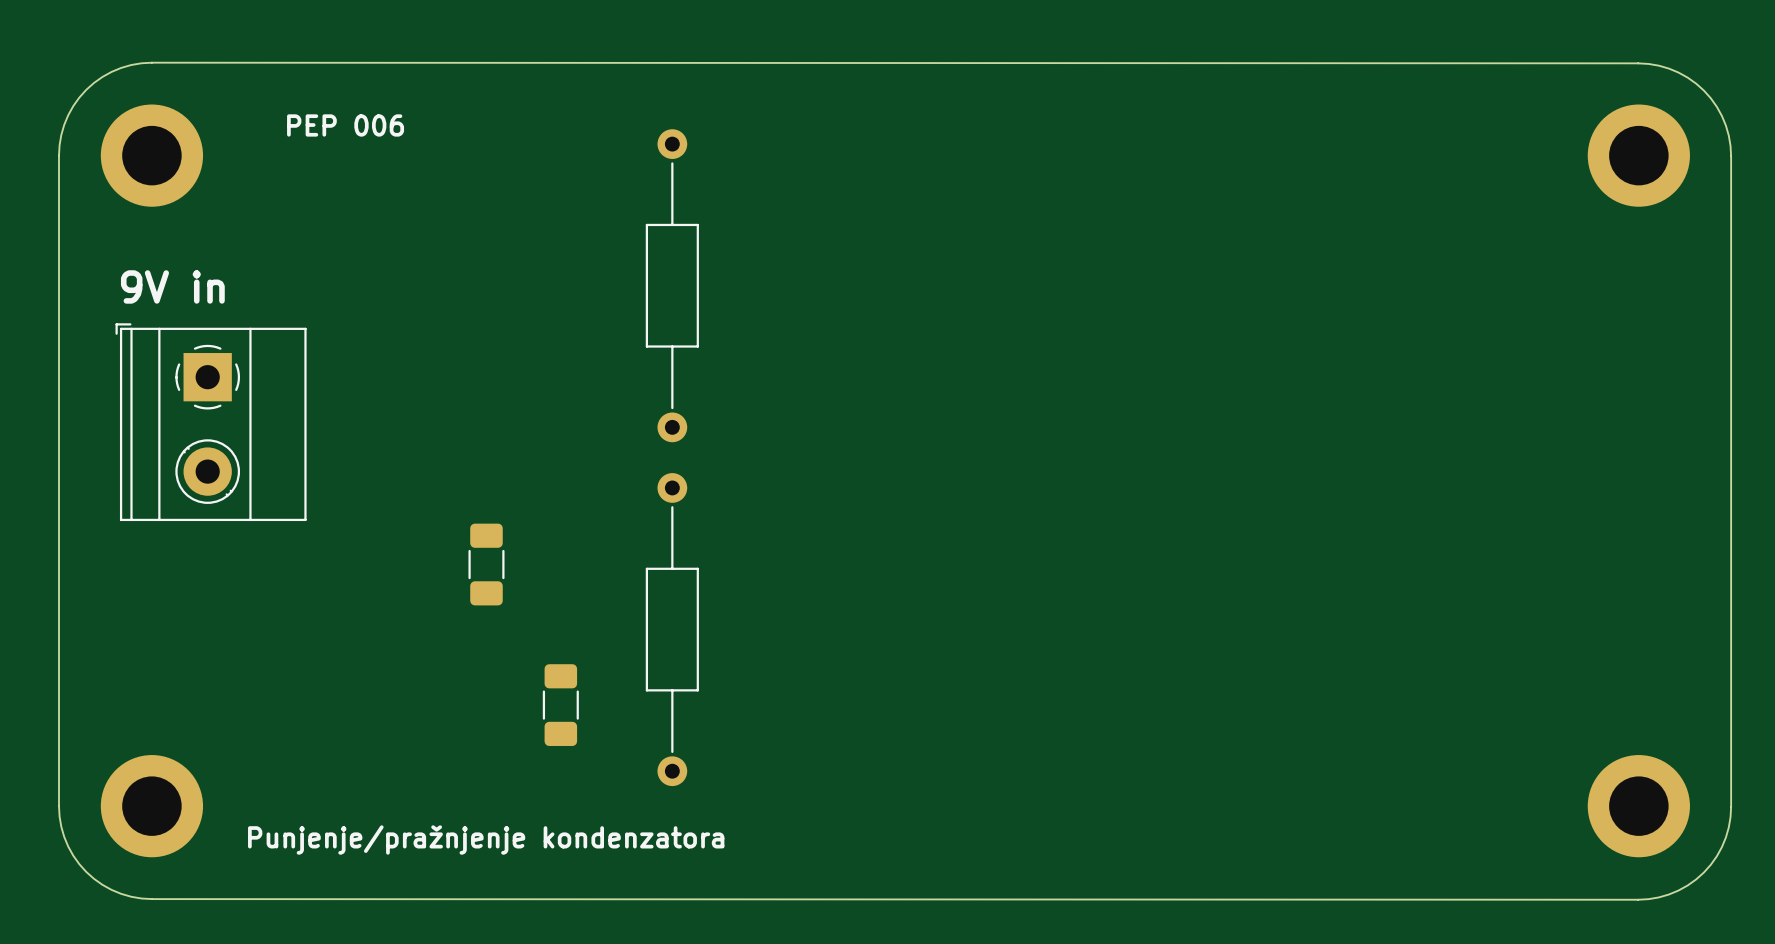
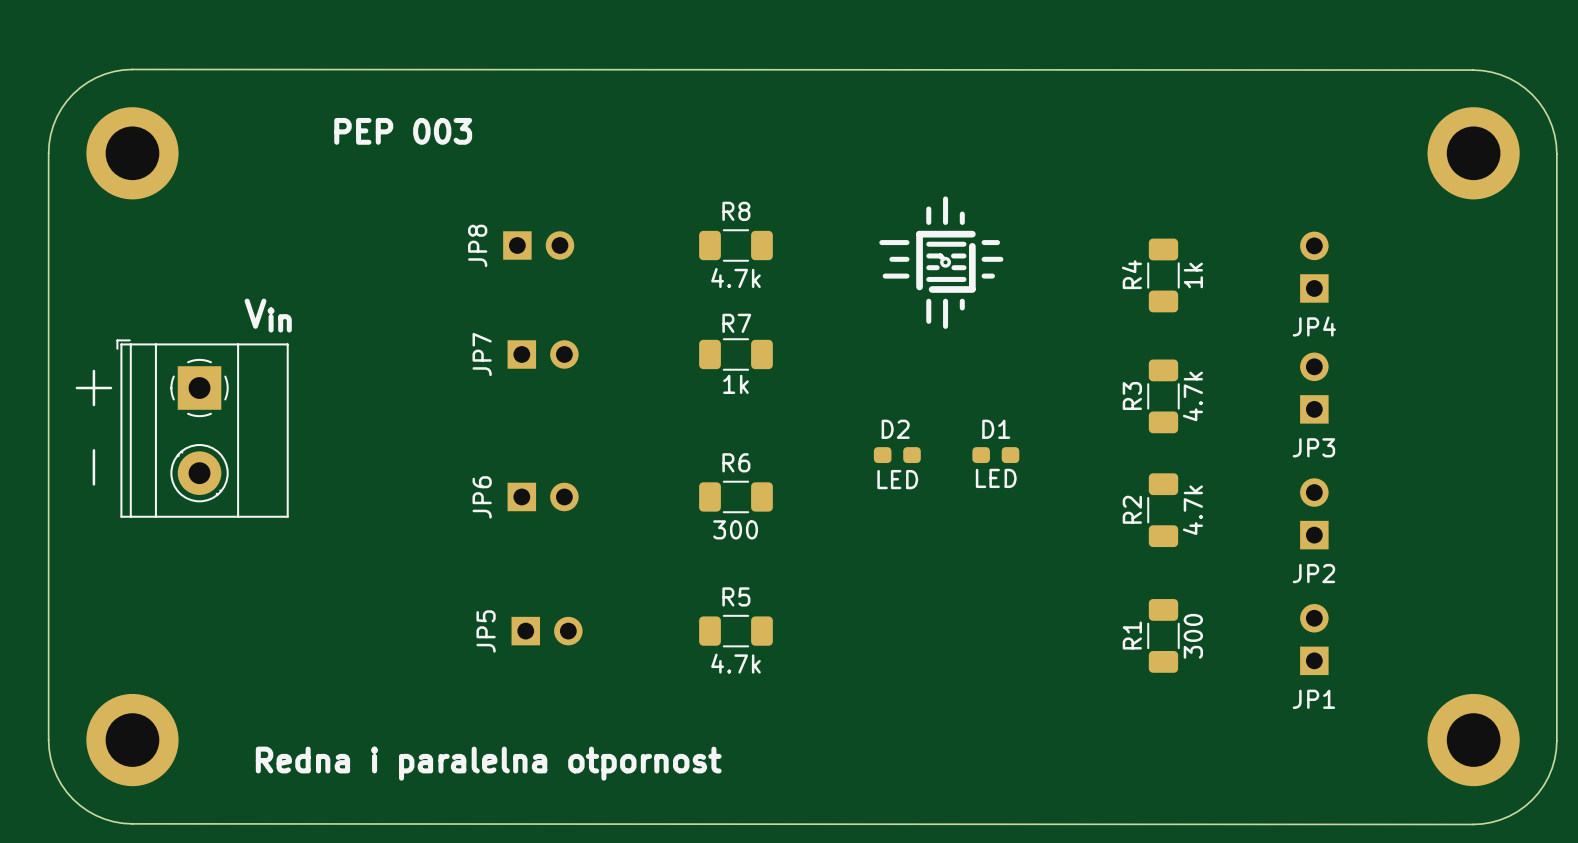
text: PEP 006 (345, 125) -> PEP 003 (403, 131)
drawing: none -> [879, 196, 1004, 329]
JP8: none -> (538, 245)
R8: none -> 4.7k (735, 245)
JP4: none -> (1314, 267)
part: (672, 285) -> none
text: 9V in (172, 286) -> none
R4: none -> 1k (1163, 275)
JP7: none -> (543, 354)
R7: none -> 1k (735, 354)
JP3: none -> (1314, 388)
part: (211, 422) -> none
R3: none -> 4.7k (1163, 396)
part: none -> (182, 428)
D2: none -> LED (897, 455)
D1: none -> LED (995, 455)
JP6: none -> (543, 496)
R6: none -> 300 (735, 496)
R2: none -> 4.7k (1162, 510)
JP2: none -> (1314, 513)
part: (486, 564) -> none
part: (672, 629) -> none
JP5: none -> (547, 631)
R5: none -> 4.7k (735, 631)
R1: none -> 300 (1163, 635)
JP1: none -> (1314, 639)
part: (560, 705) -> none
text: none -> Redna i paralelna otpornost (488, 763)
text: Punjenje/pražnjenje kondenzatora (486, 839) -> none

